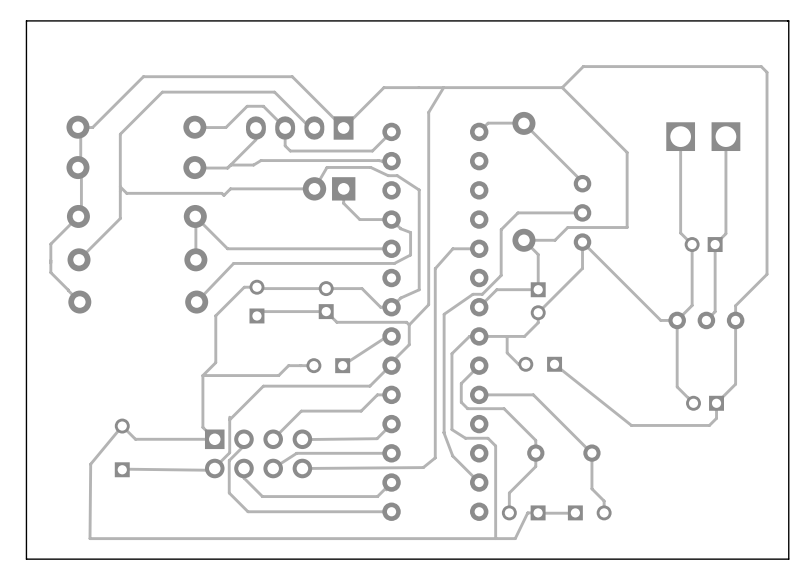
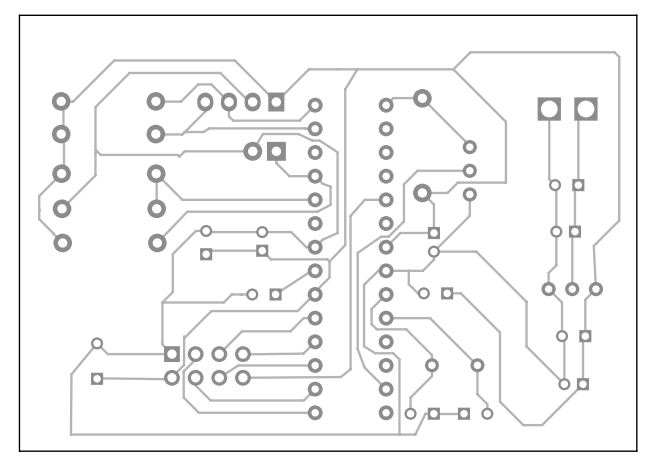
track: (725, 136) (725, 233) (715, 244) (715, 311) (706, 320) -> (585, 109) (578, 116) (578, 185) (574, 188) (574, 231) (572, 234) (572, 289)
track: (680, 223) (680, 233) (692, 244) (692, 305) (677, 320) -> (549, 179) (556, 186) (556, 265) (548, 272) (548, 289) (562, 302) (564, 384) (526, 346) (526, 301) (476, 251) (433, 251)
part: none -> (566, 185)
part position: (703, 244) -> (565, 231)
track: (587, 246) (660, 320) (677, 320) -> none
track: (735, 305) (735, 384) (716, 403) (716, 418) (709, 425) (631, 425) (554, 364) -> (593, 245) (595, 289) (585, 299) (582, 384) (542, 425) (523, 425) (499, 401) (499, 332) (460, 293) (447, 293)
track: (677, 320) (677, 386) (693, 403) -> none
part position: (706, 320) -> (572, 289)
part: (705, 403) -> none
part: none -> (573, 336)
part: none -> (573, 384)

